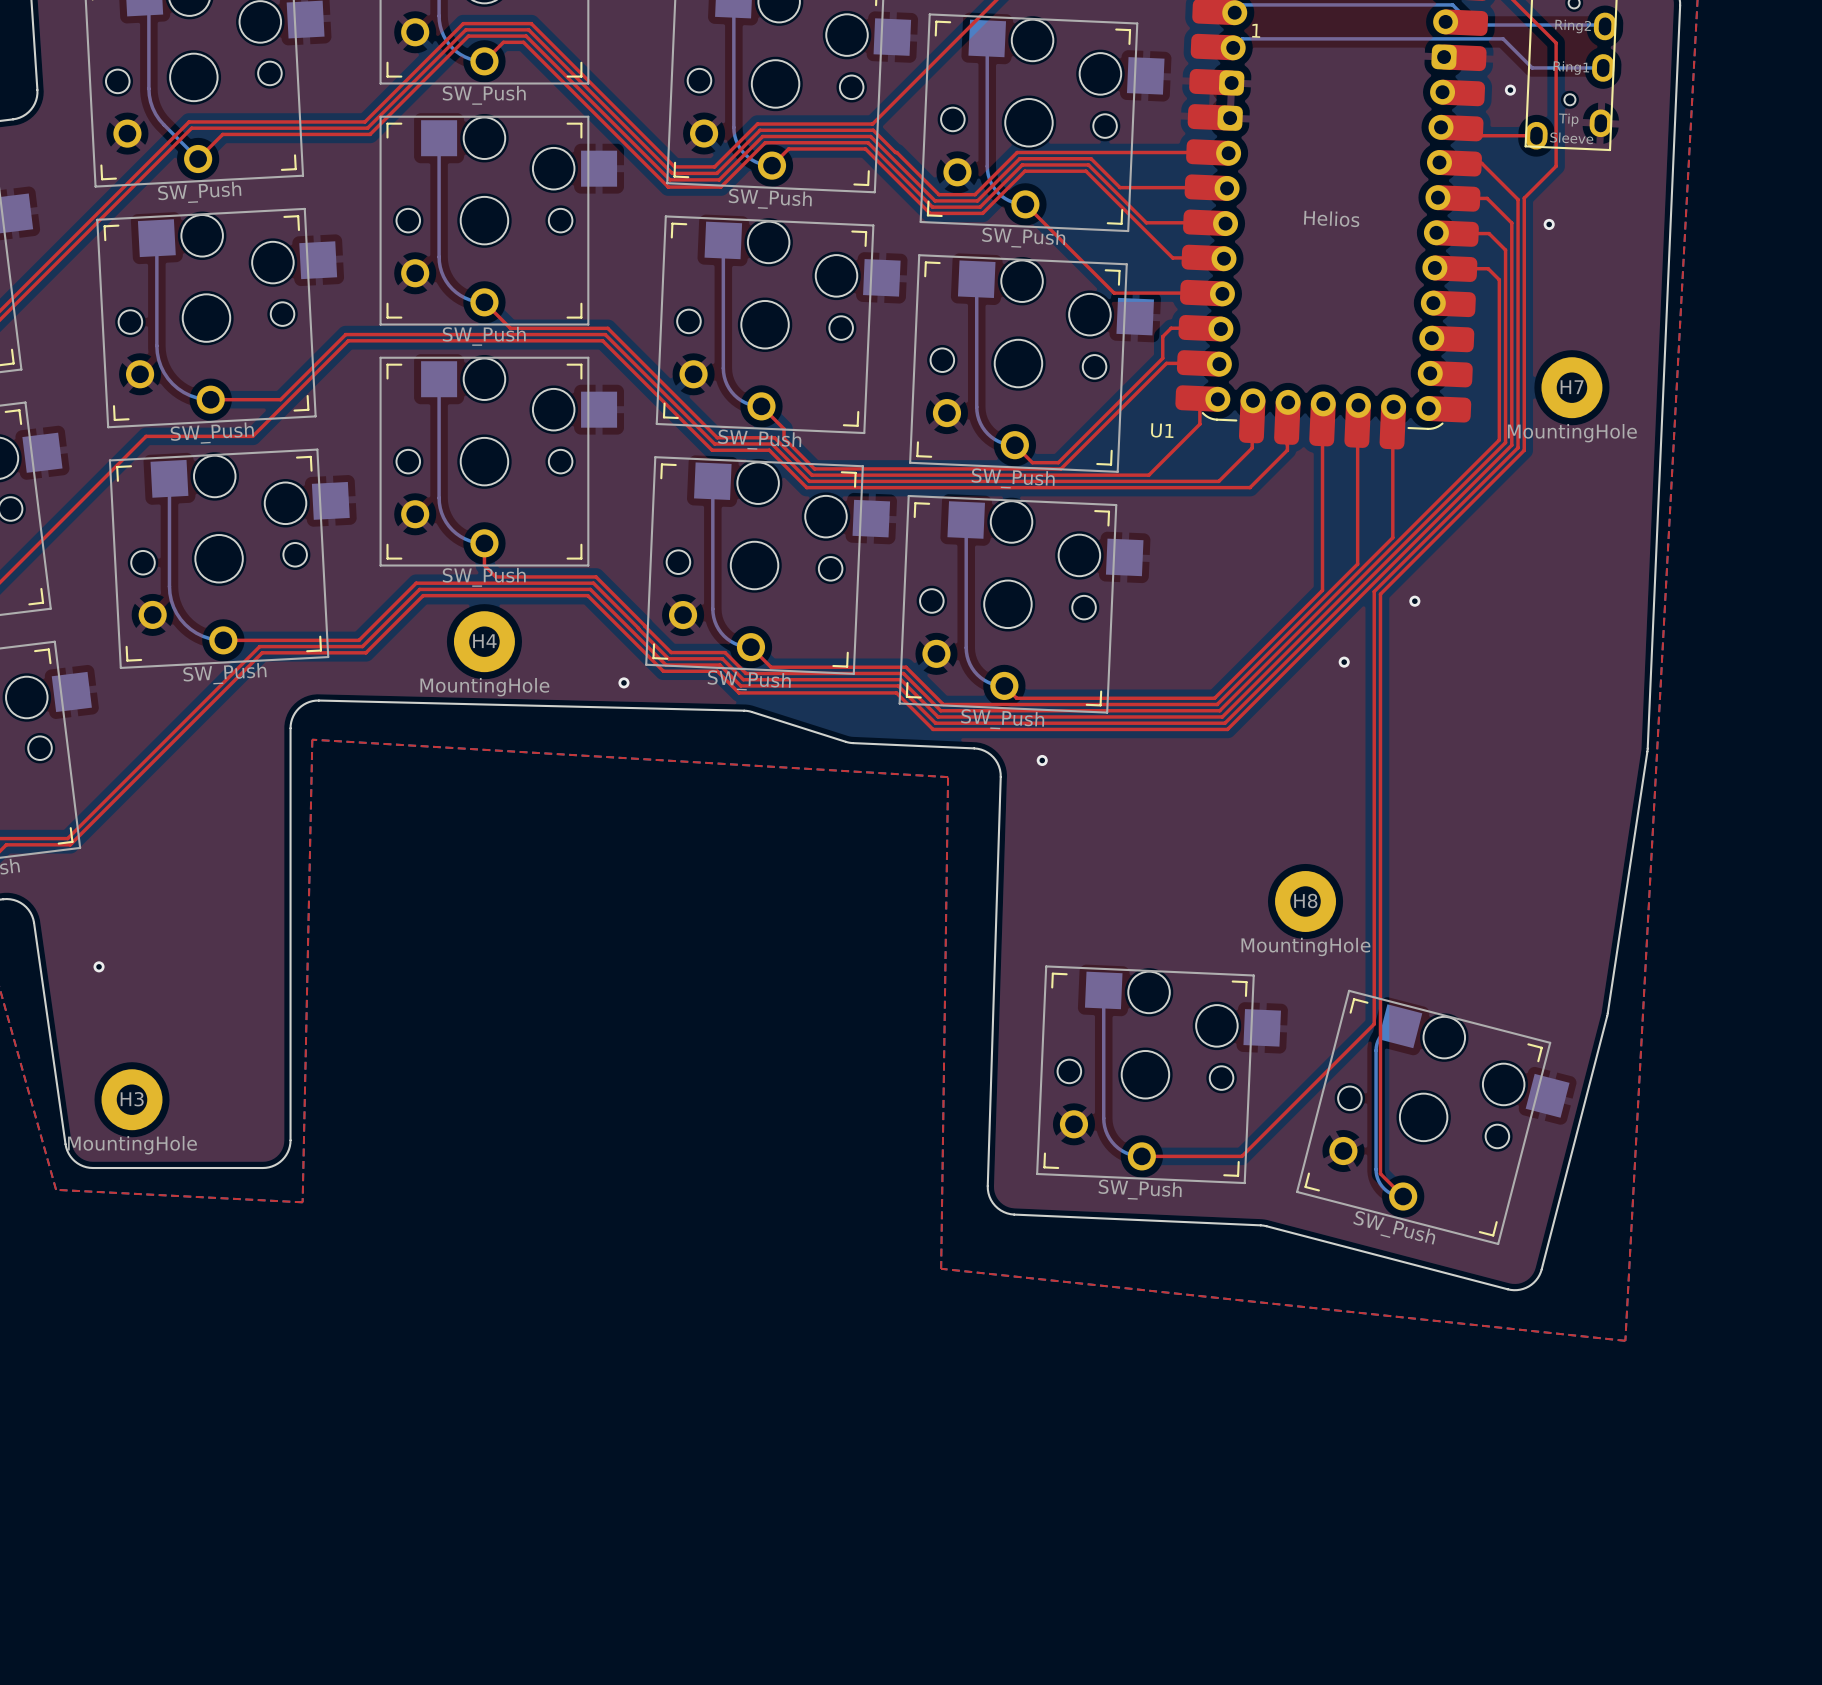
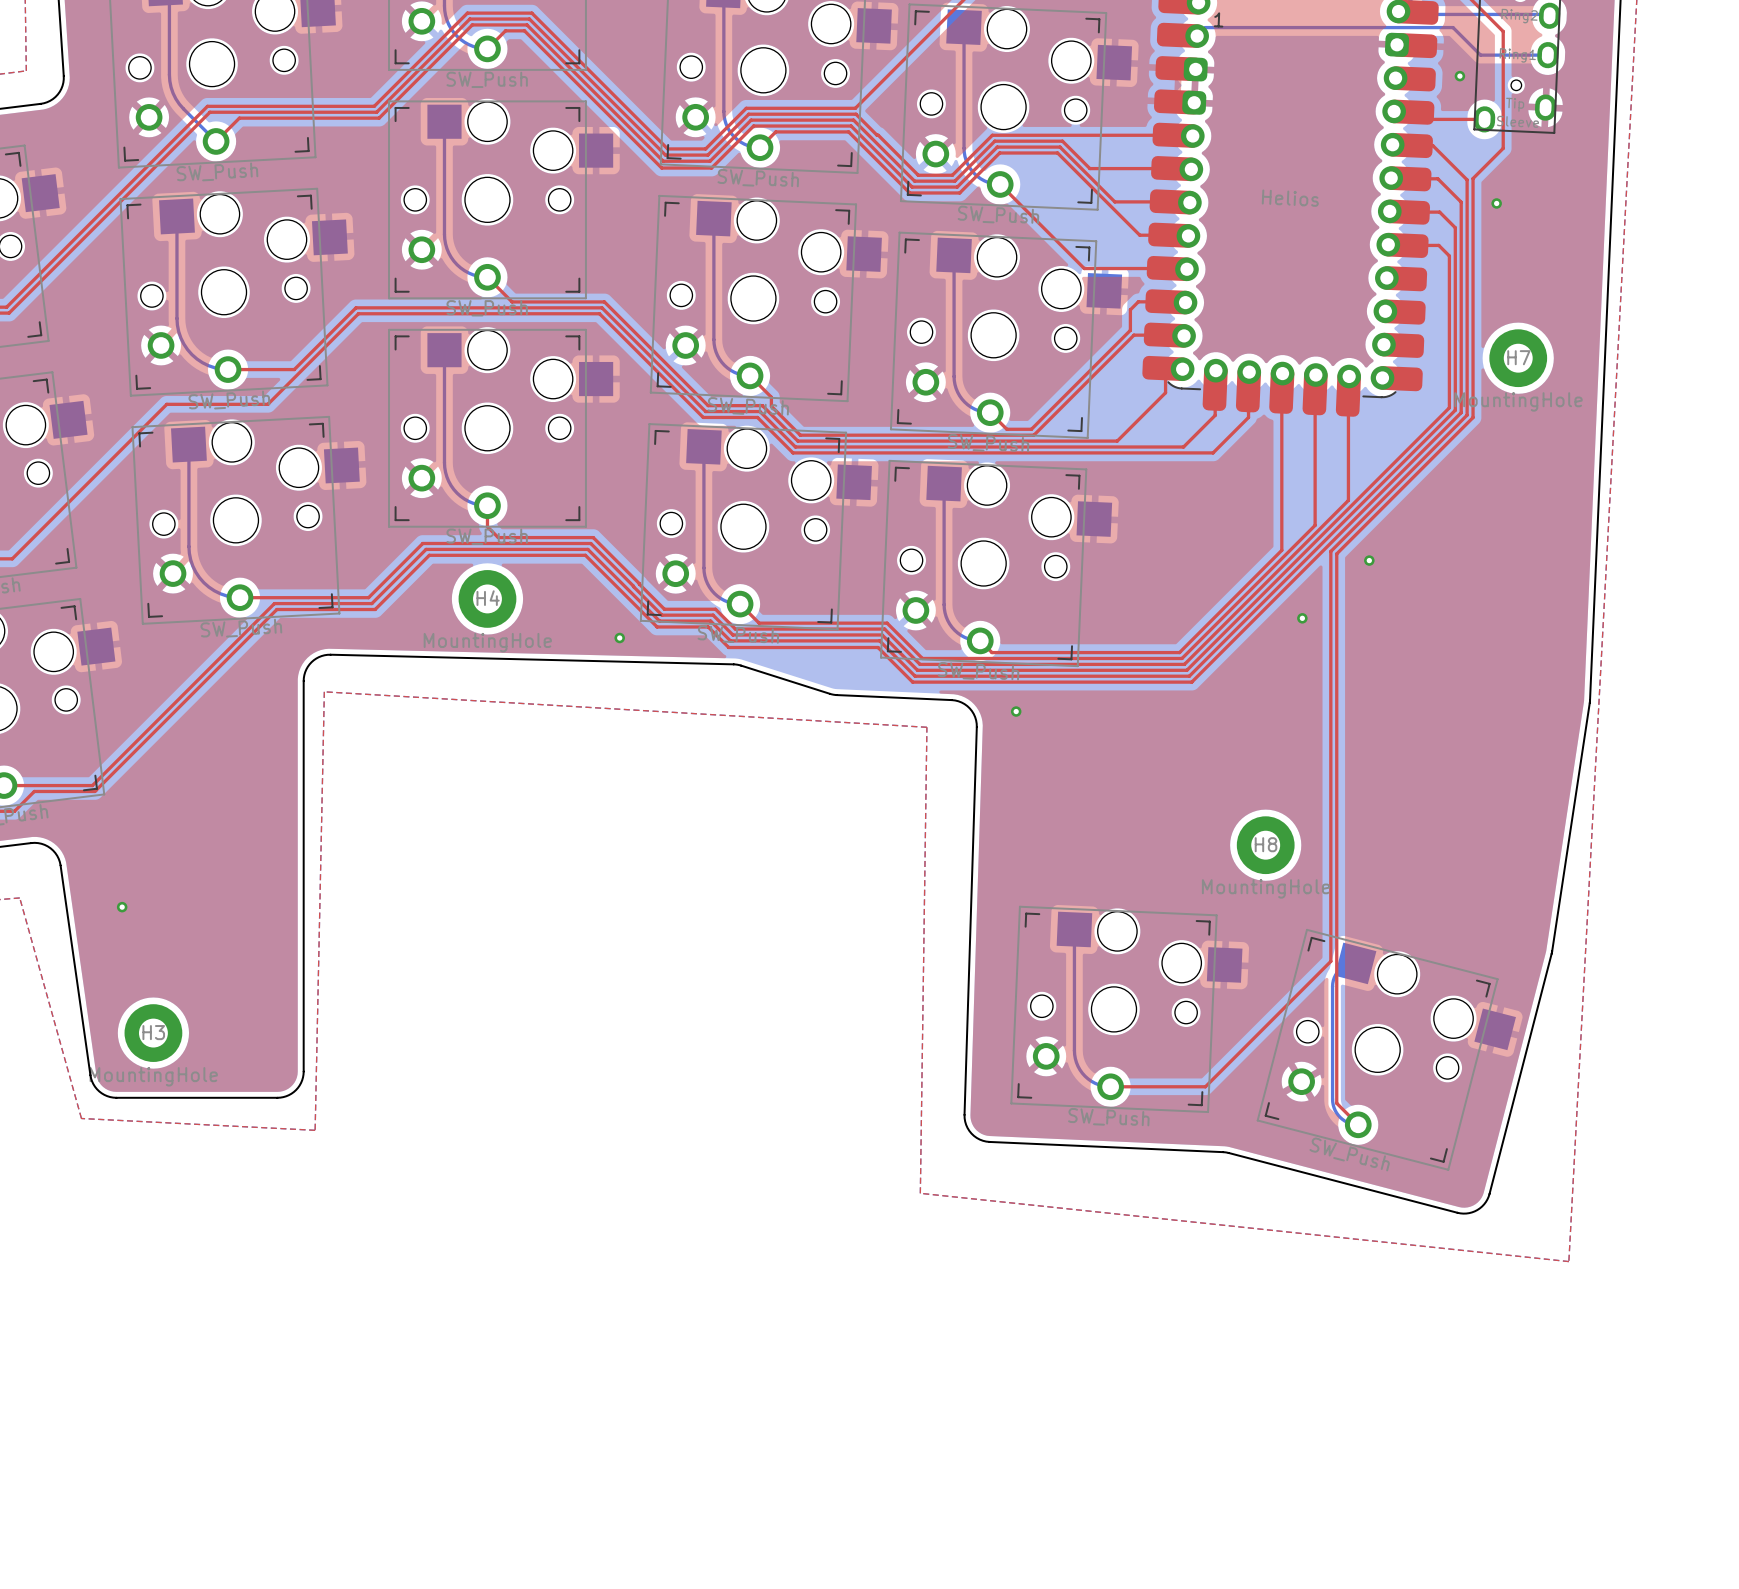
U1 name: U1 (1162, 430) -> none

